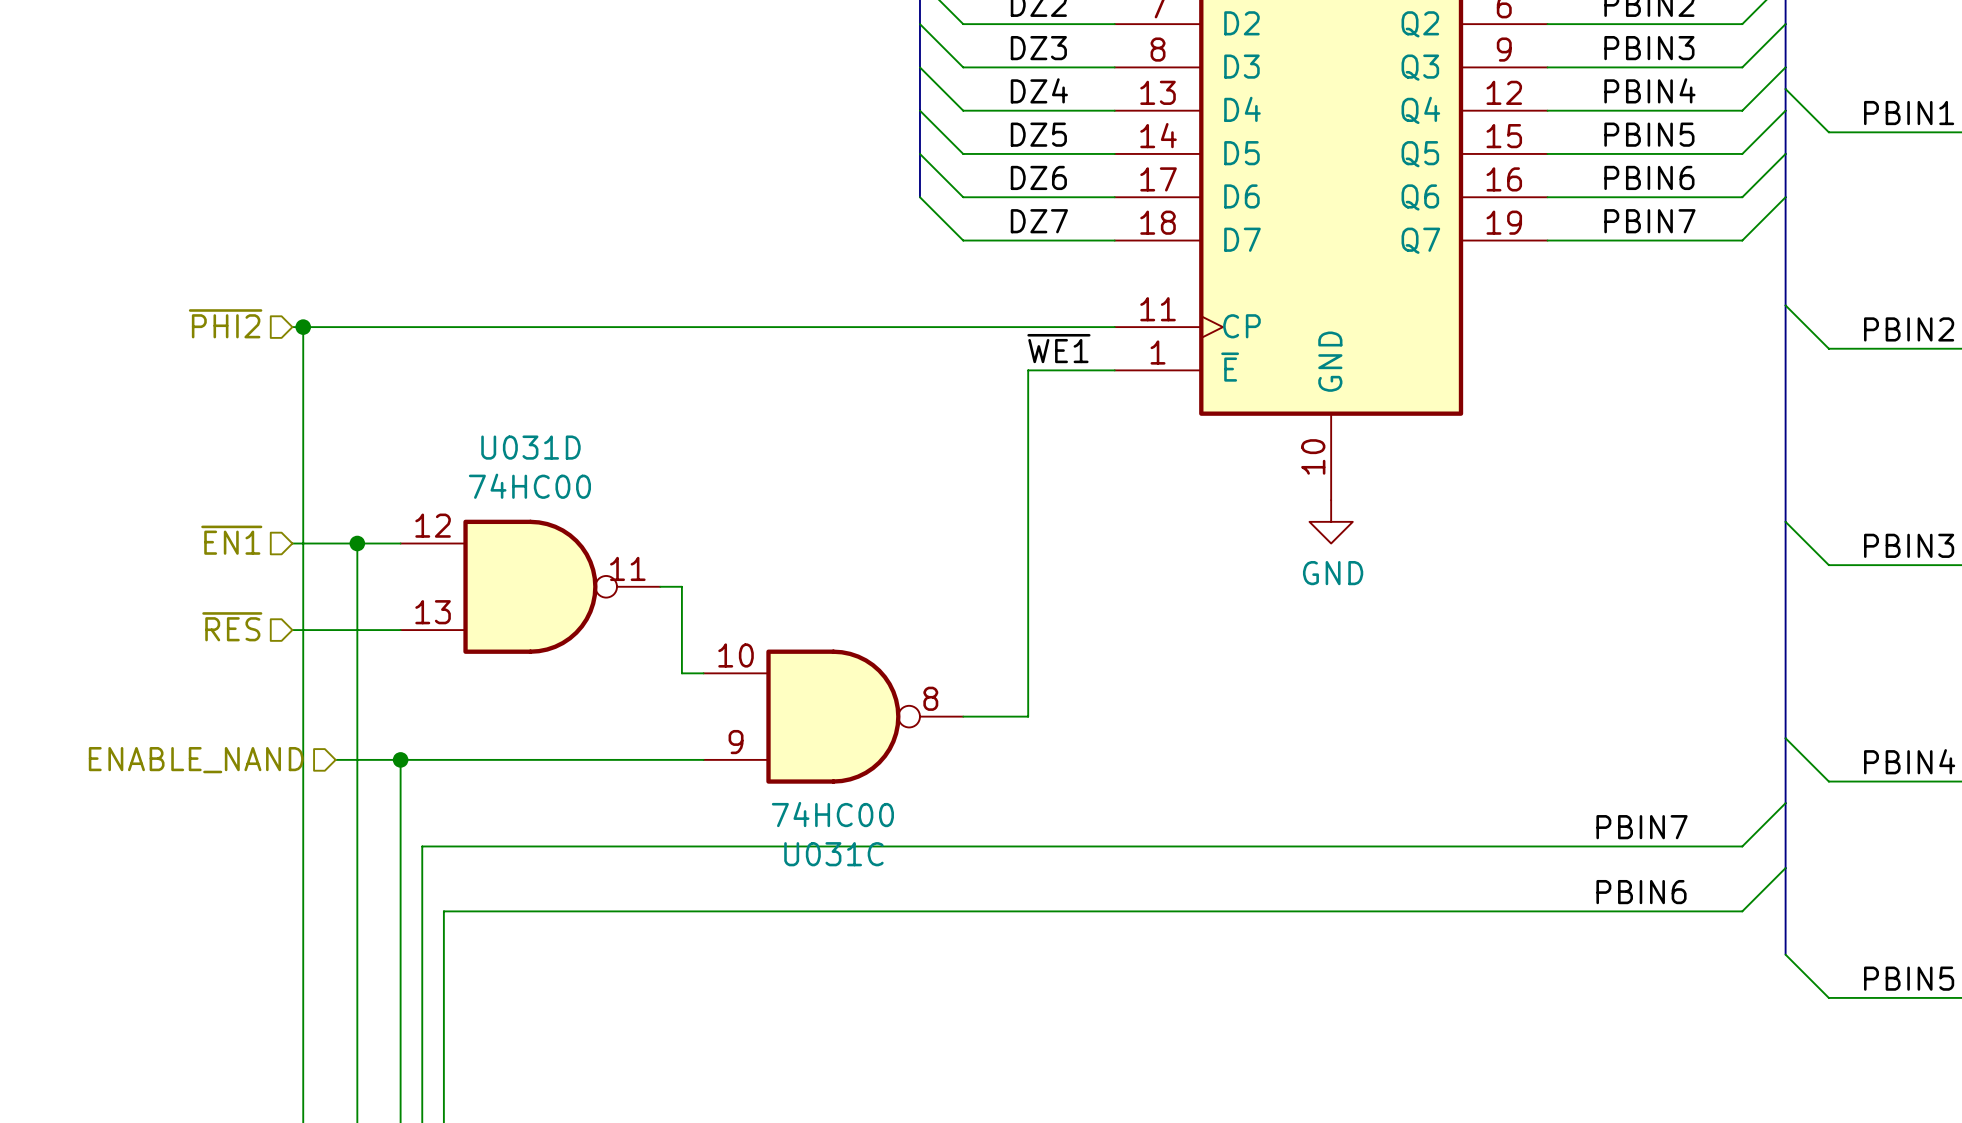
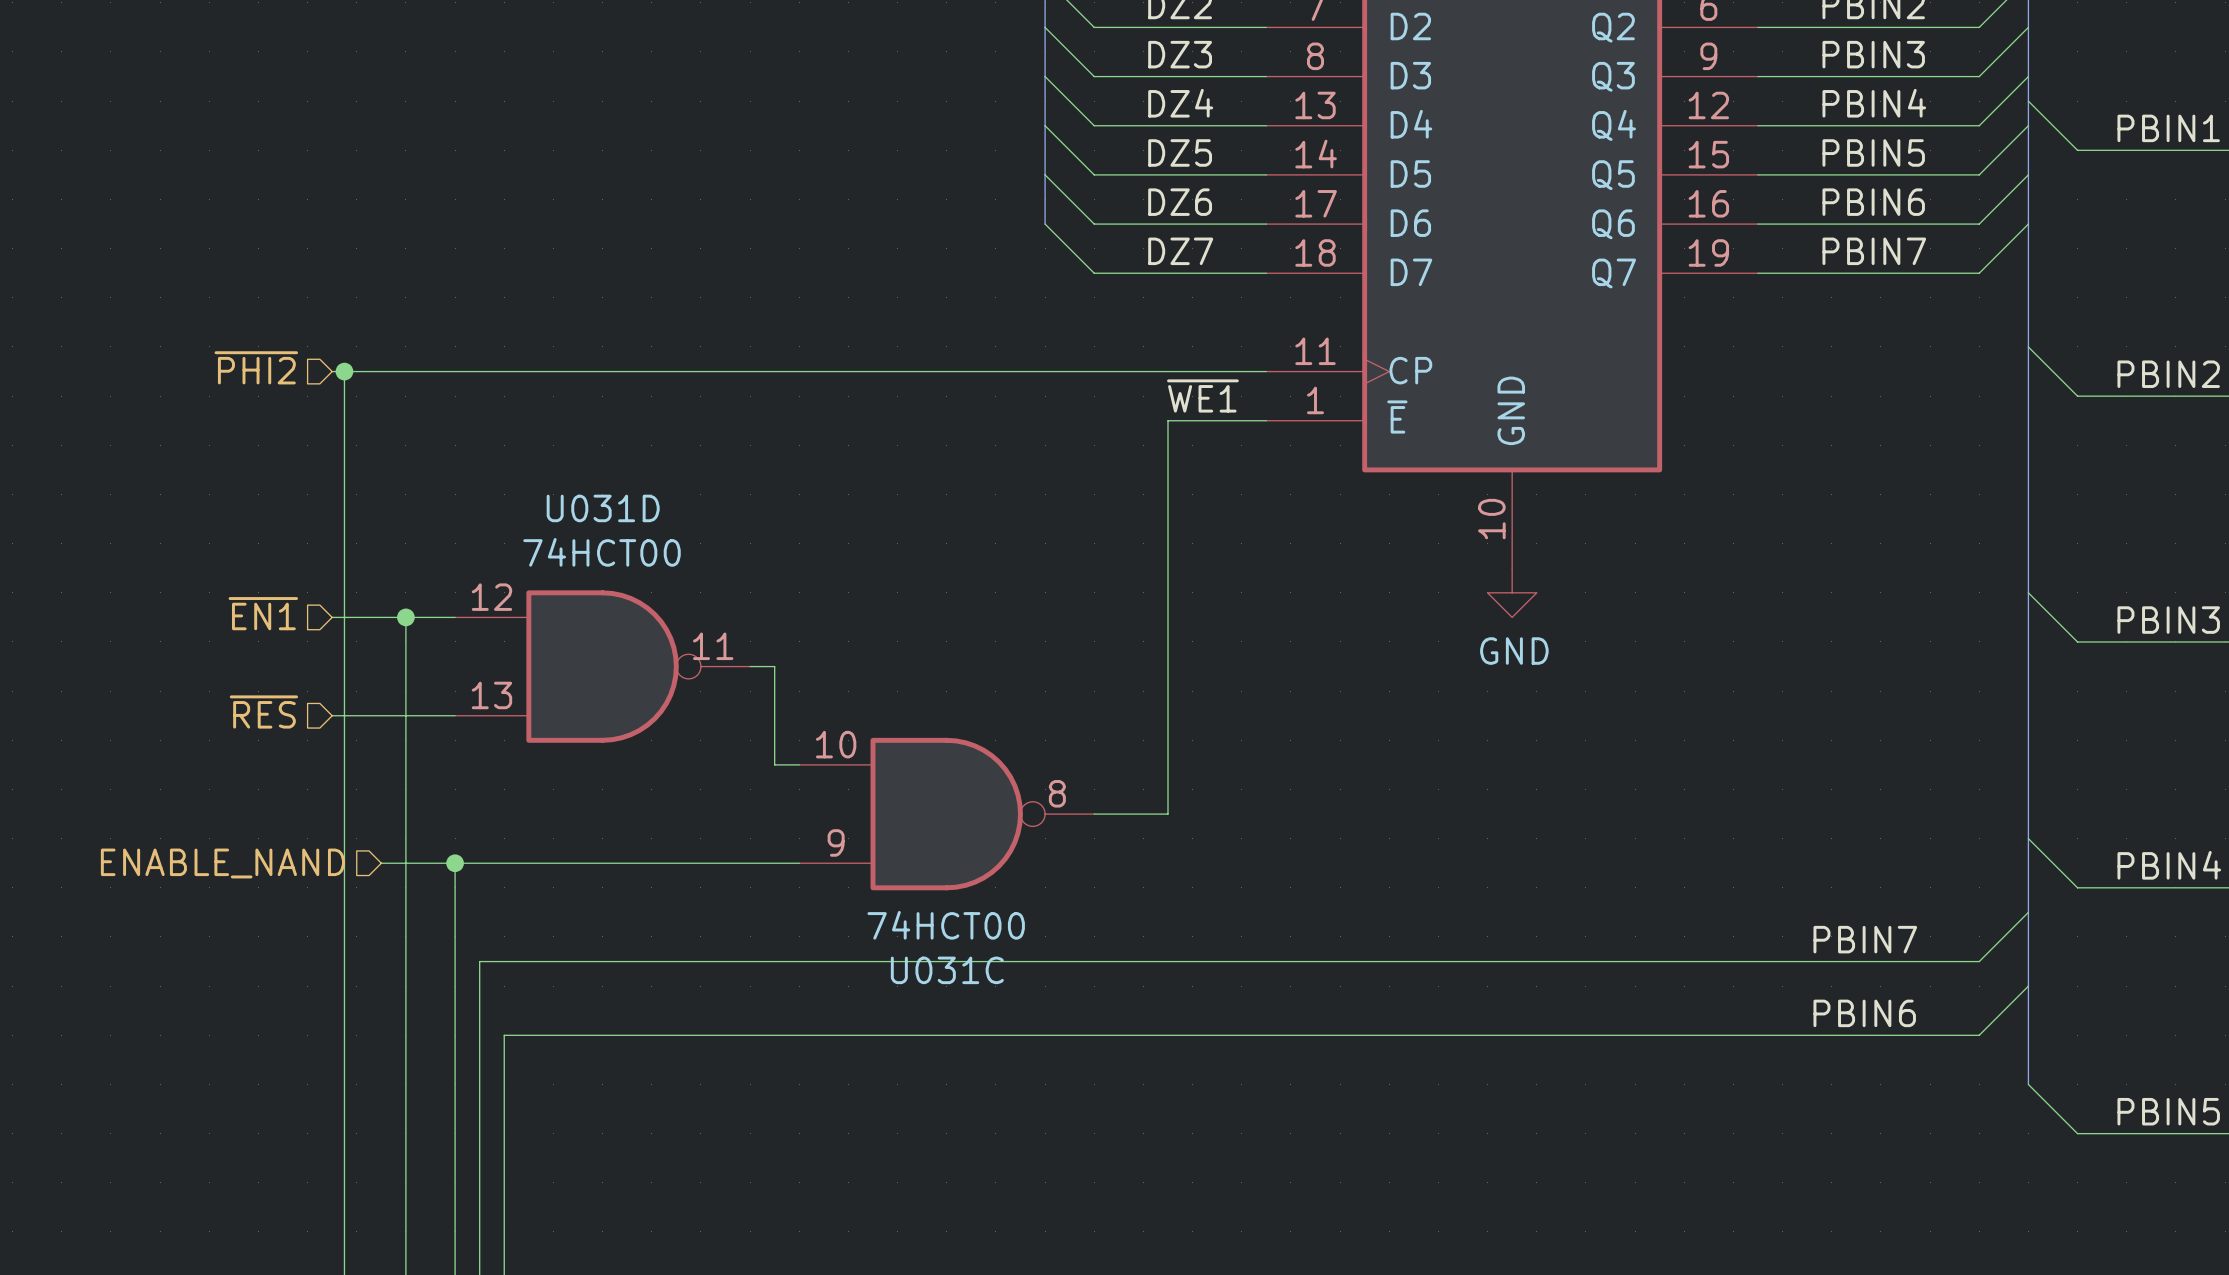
U031D value: 74HC00 (529, 486) -> 74HCT00 (602, 552)
U031C value: 74HC00 (832, 814) -> 74HCT00 (946, 925)

